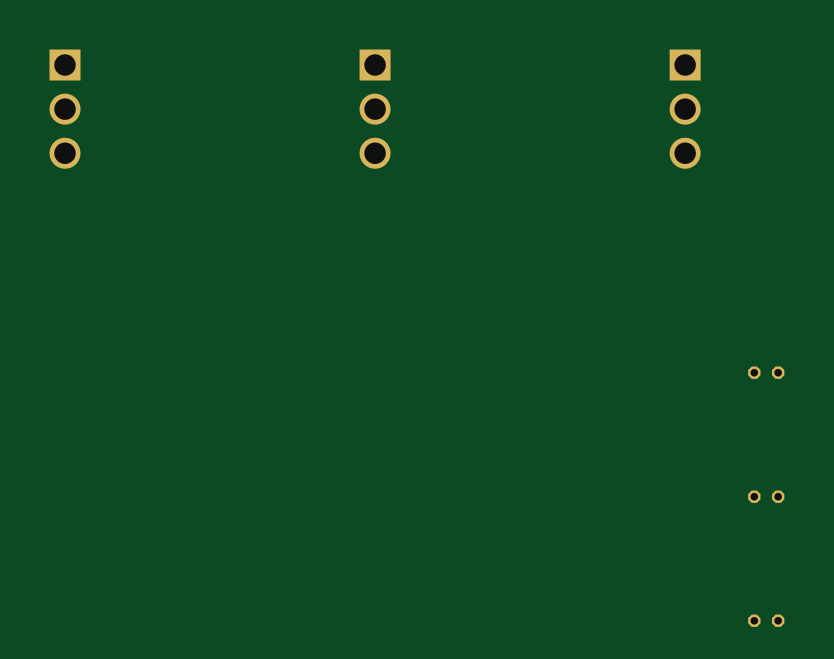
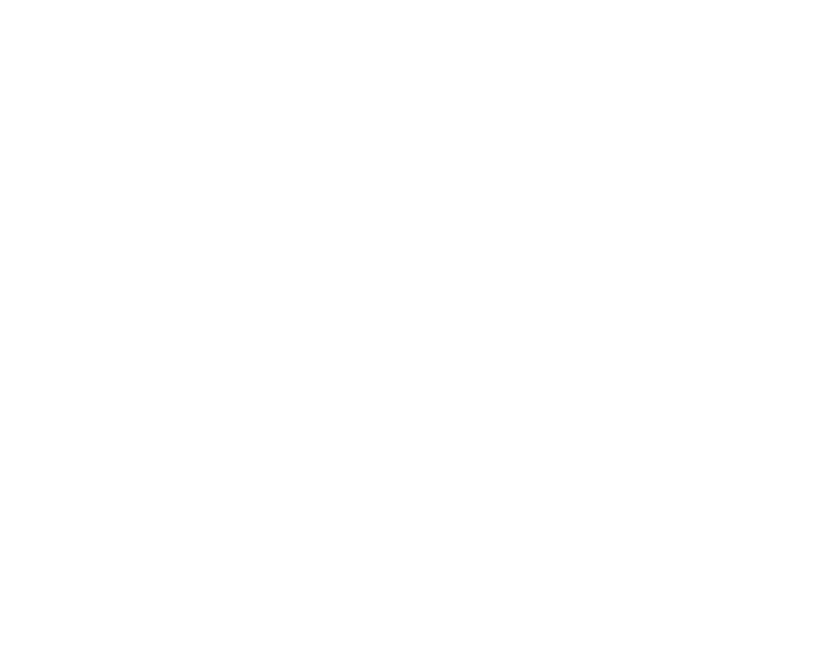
part: (65, 109) -> none
part: (375, 109) -> none
part: (685, 109) -> none
part: (766, 372) -> none
part: (766, 496) -> none
part: (766, 620) -> none

